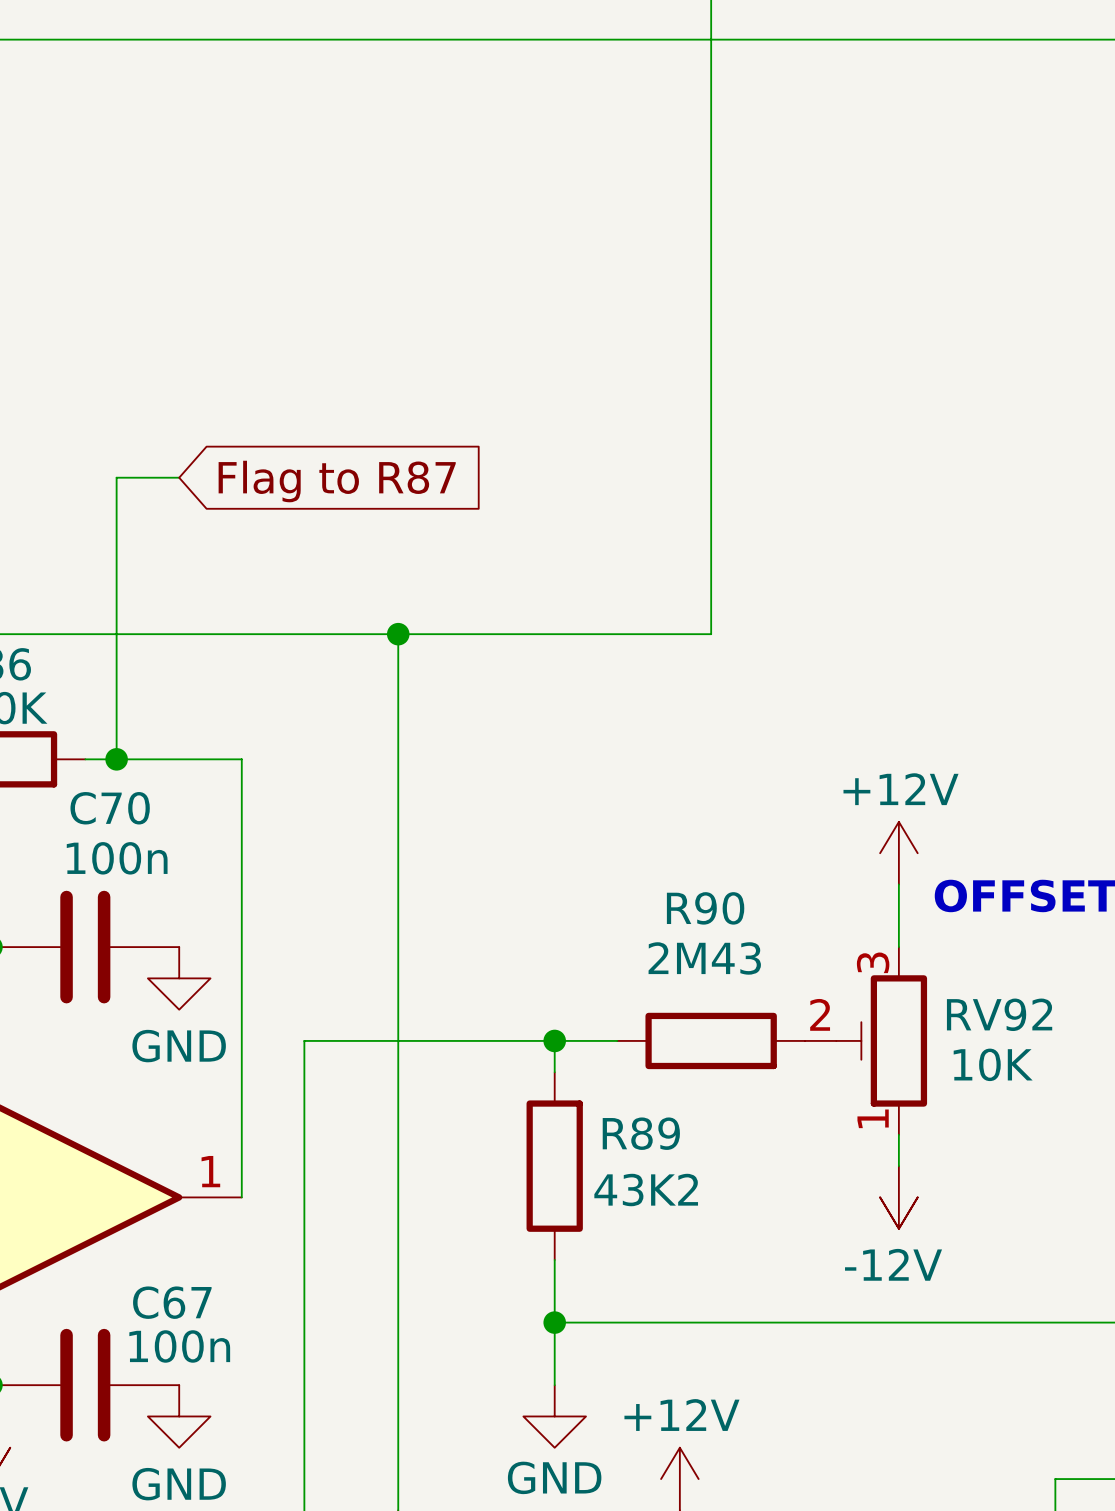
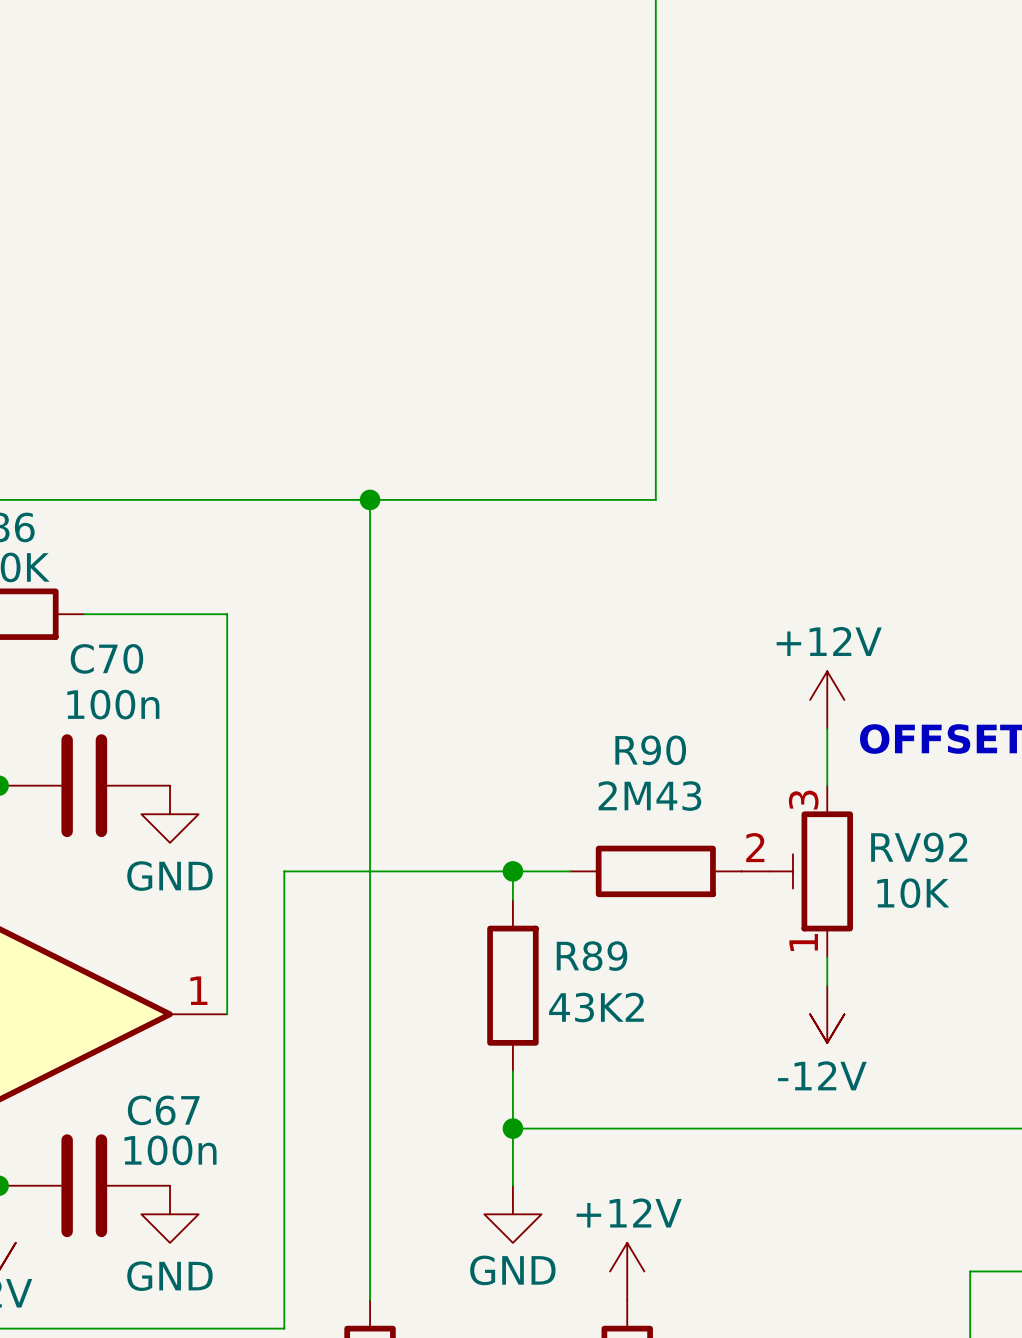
wire: (179, 477) (116, 477) (116, 759) -> none
global label: Flag to R87 (337, 481) -> none
junction: (116, 759) -> none

